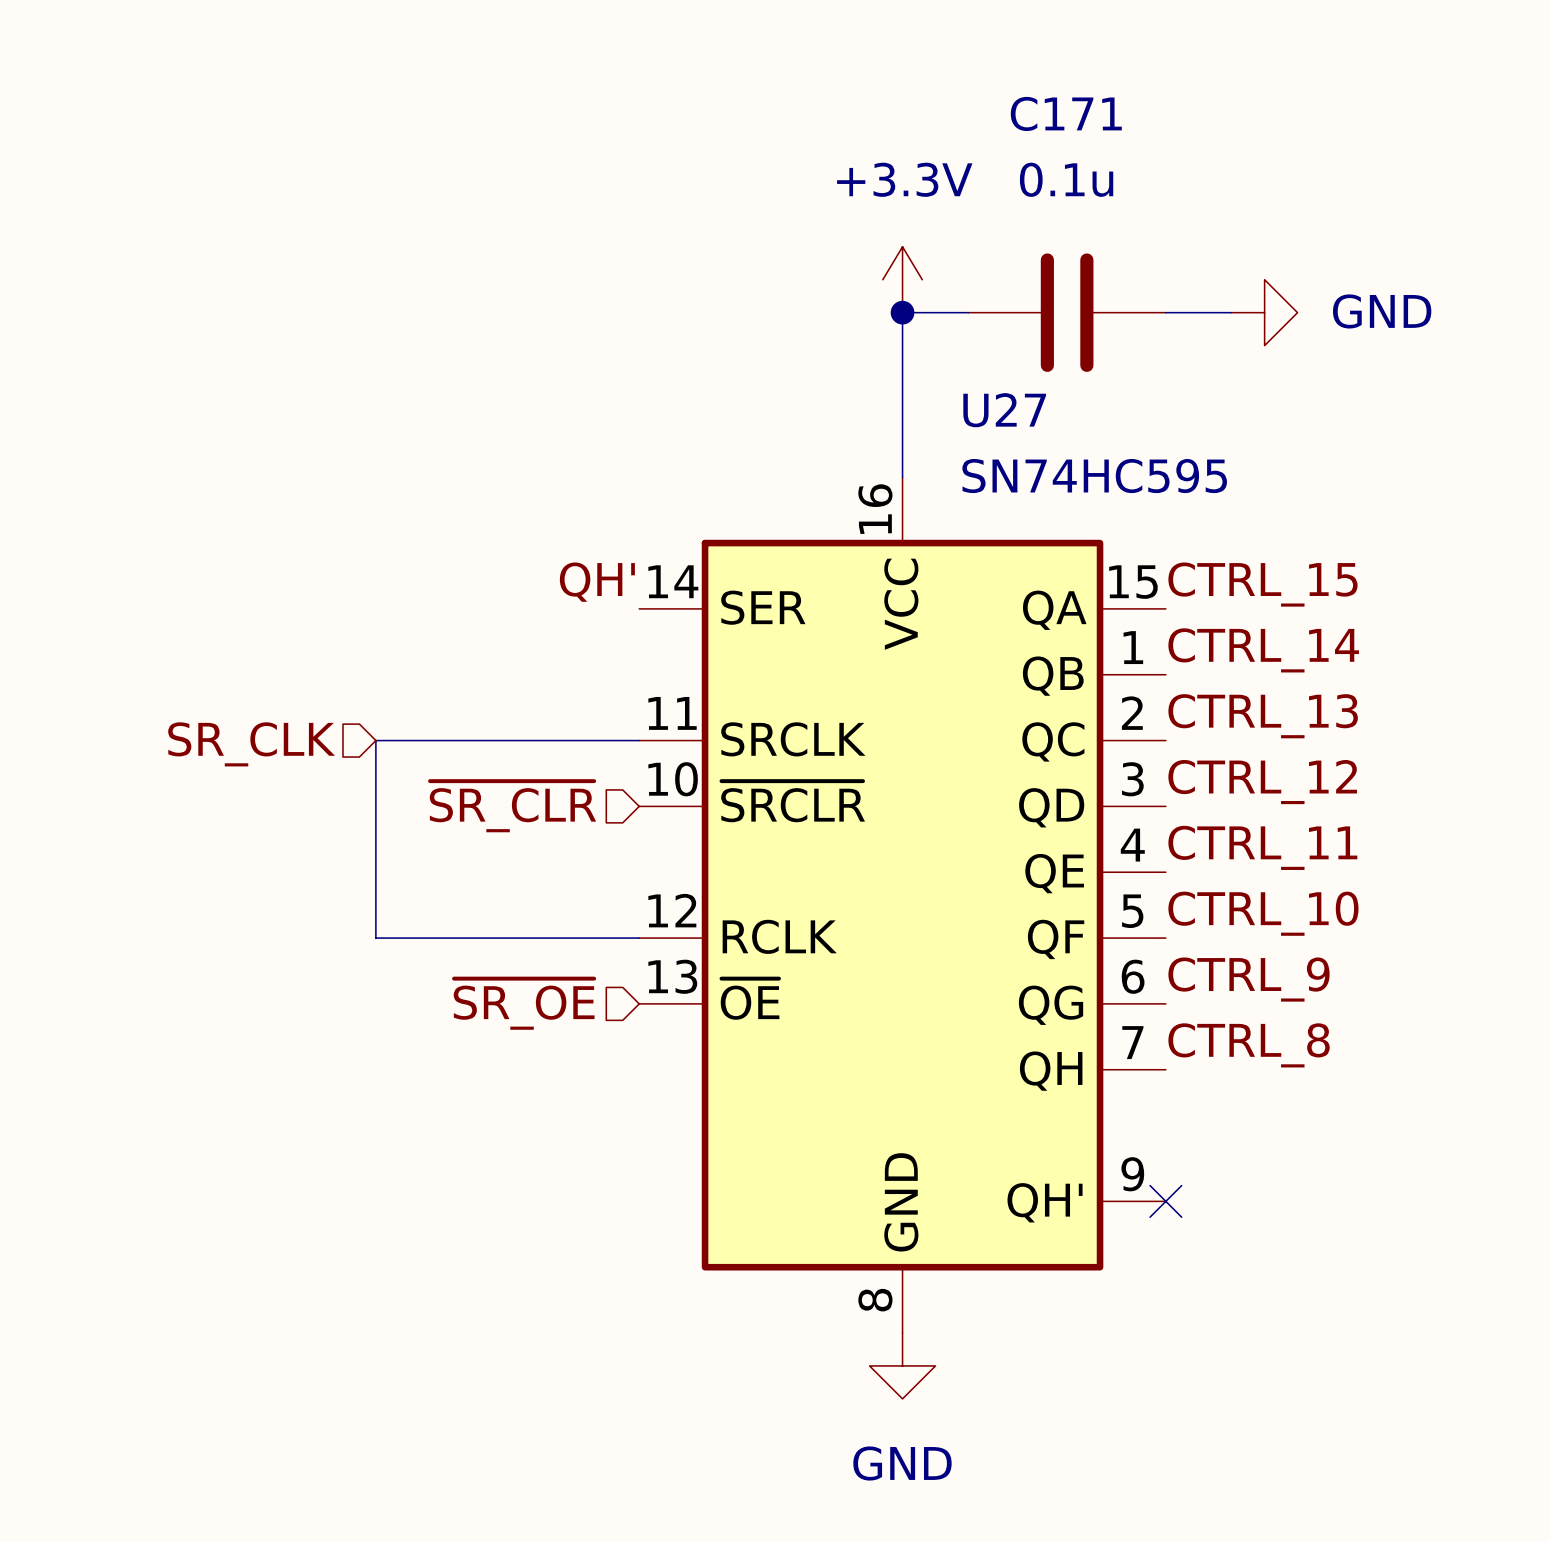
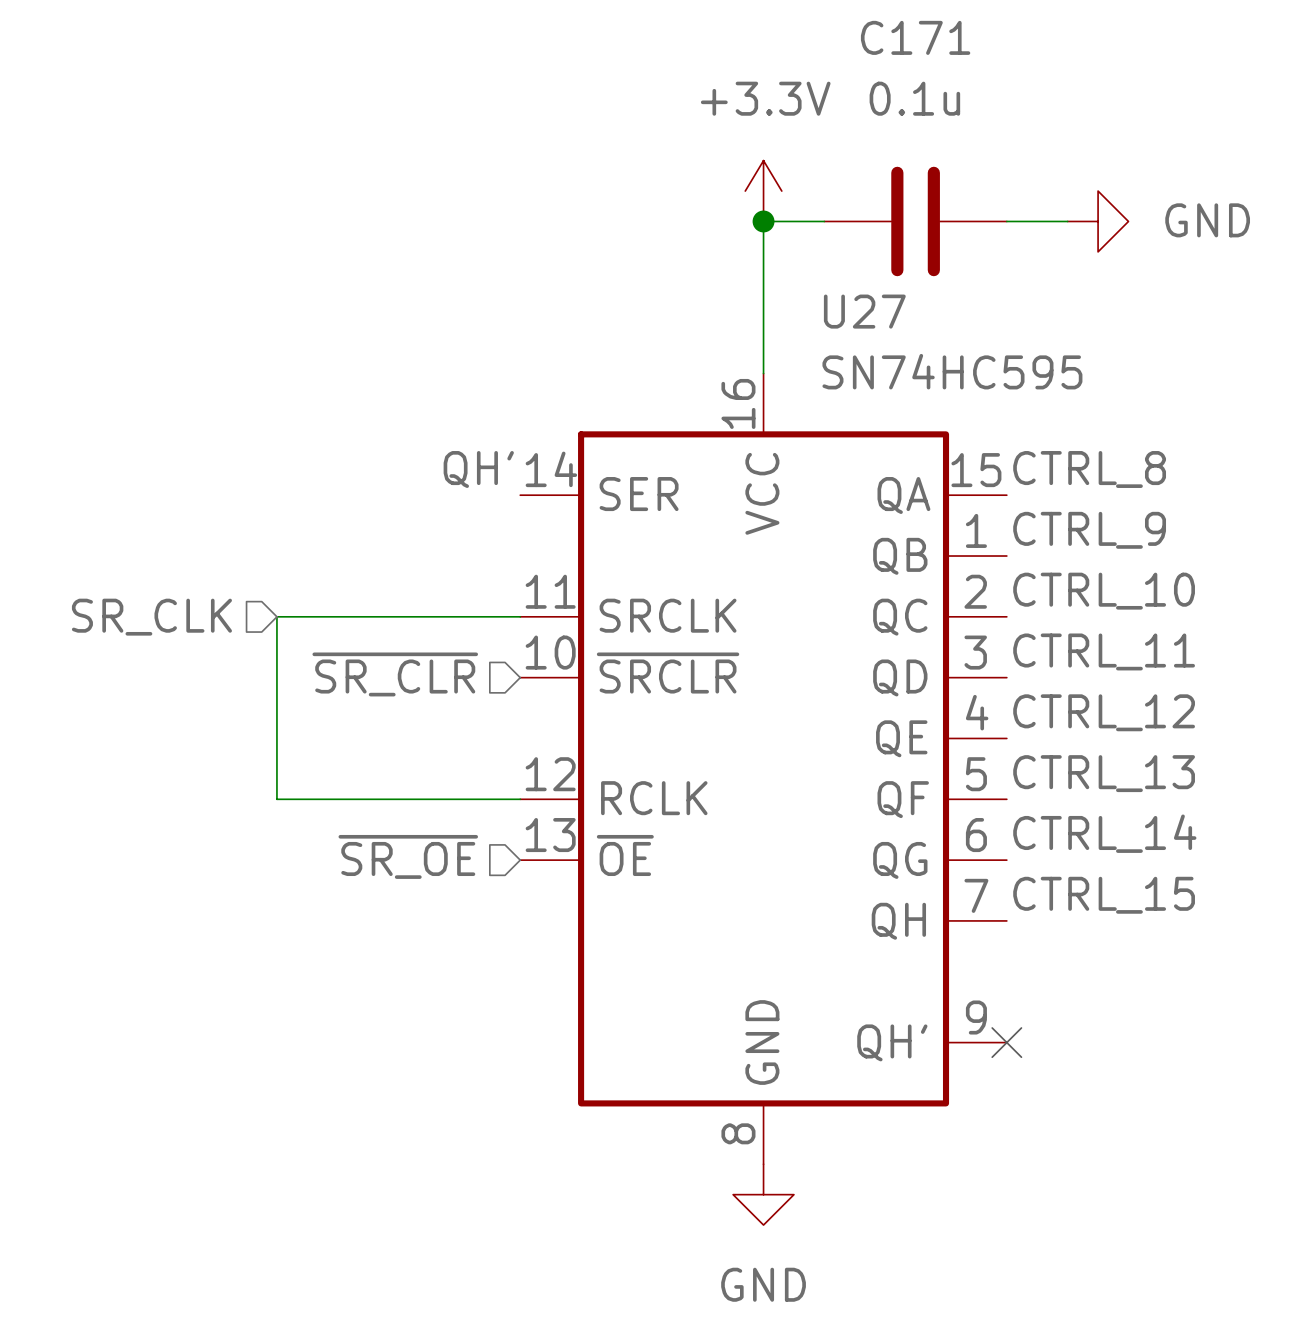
label: CTRL_15 (1262, 584) -> CTRL_8 (1089, 469)
label: CTRL_14 (1263, 650) -> CTRL_9 (1089, 530)
label: CTRL_13 (1263, 716) -> CTRL_10 (1104, 591)
label: CTRL_12 (1262, 782) -> CTRL_11 (1104, 651)
label: CTRL_11 (1262, 847) -> CTRL_12 (1104, 712)
label: CTRL_10 (1263, 913) -> CTRL_13 (1104, 773)
label: CTRL_9 (1249, 979) -> CTRL_14 (1104, 833)
label: CTRL_8 (1249, 1045) -> CTRL_15 (1104, 895)

